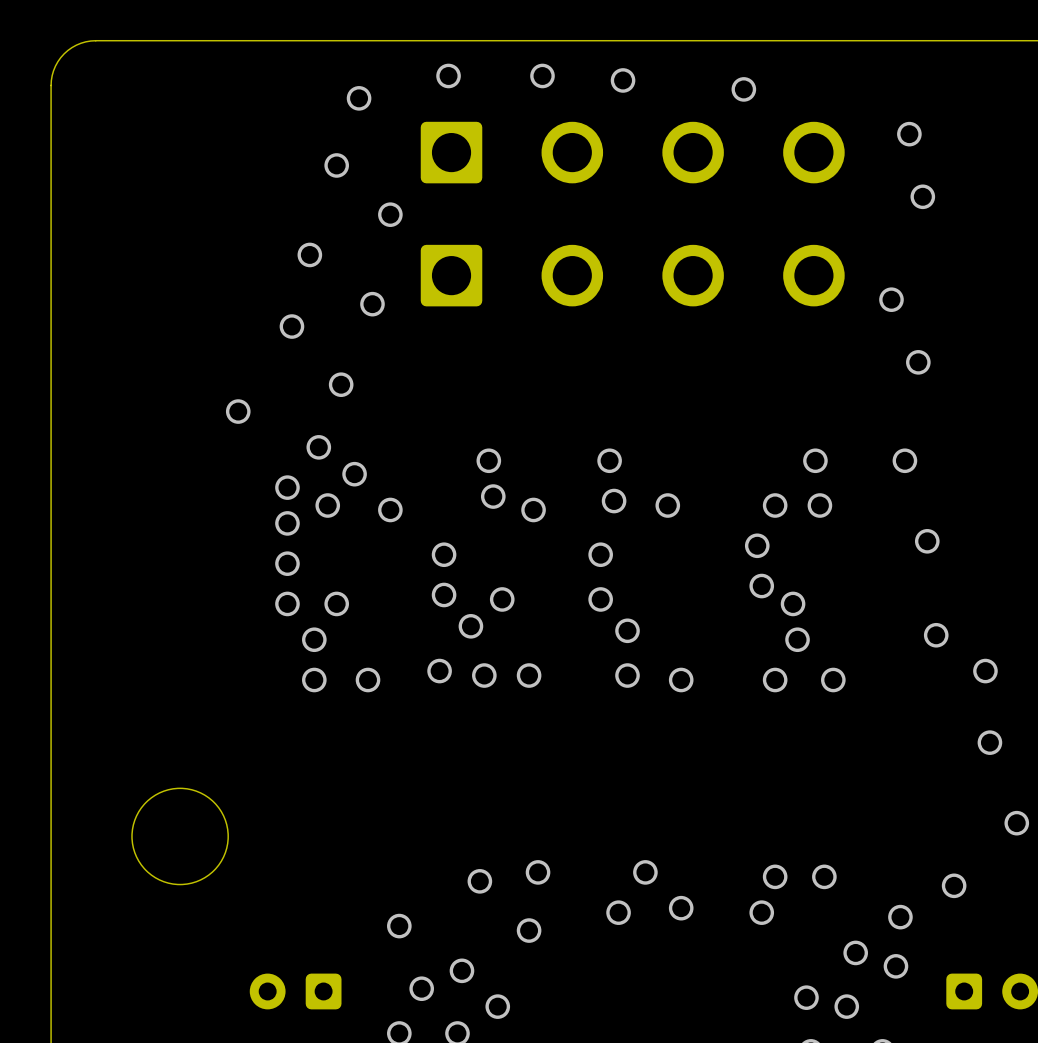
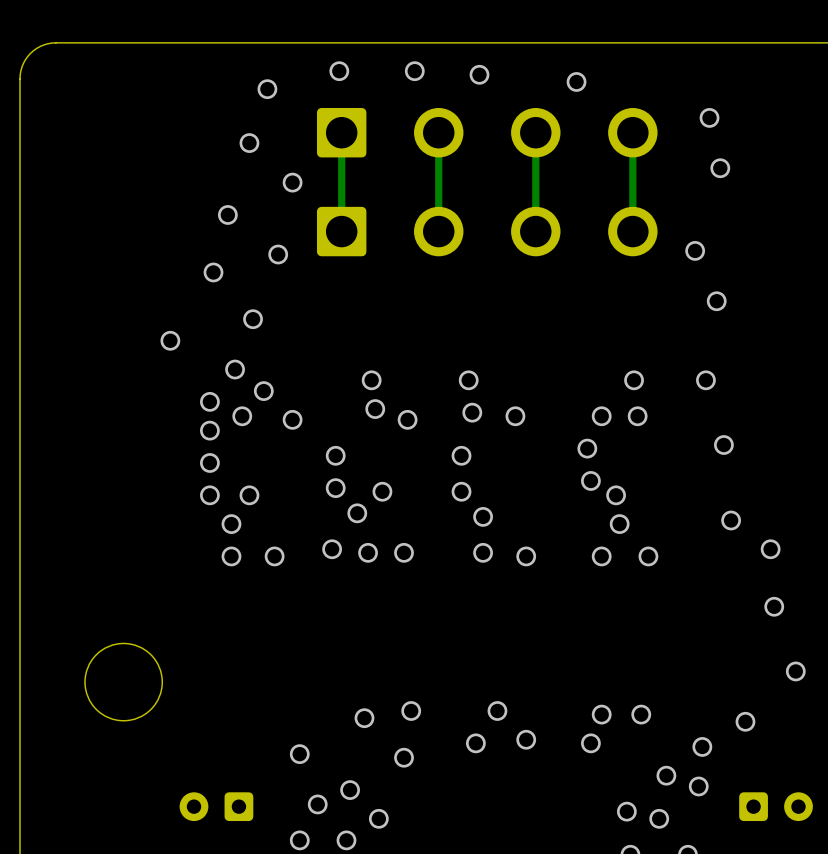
track: none -> (341, 132) (341, 231)
track: none -> (438, 132) (438, 231)
track: none -> (535, 132) (535, 231)
track: none -> (632, 132) (632, 231)

